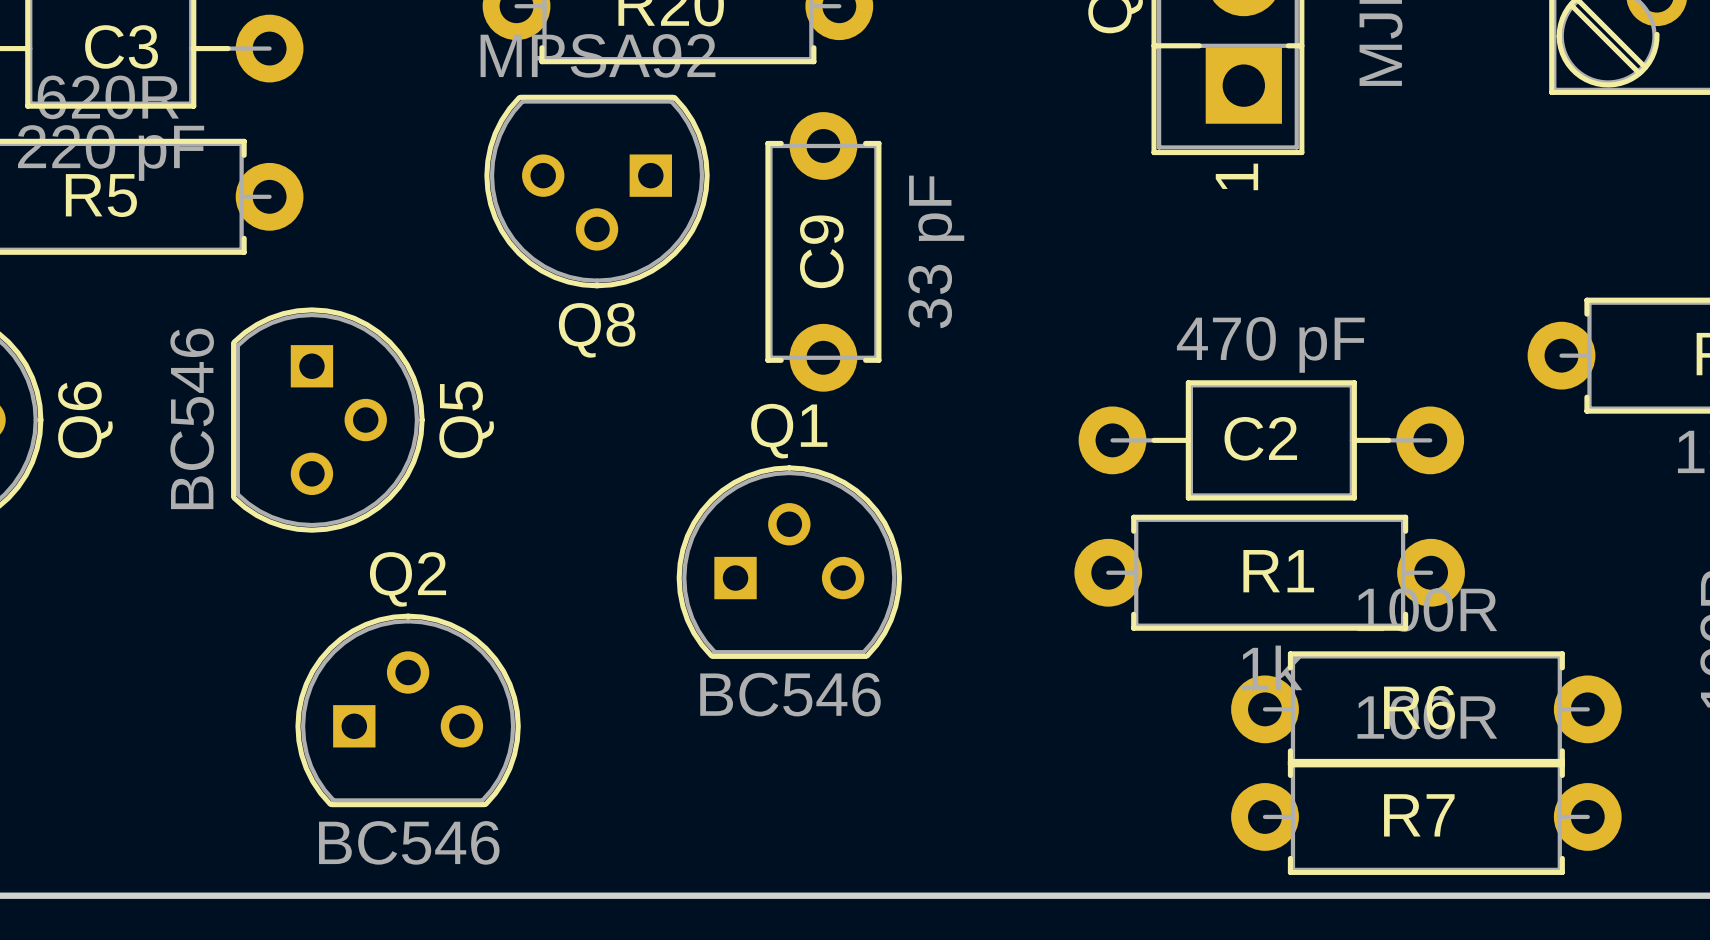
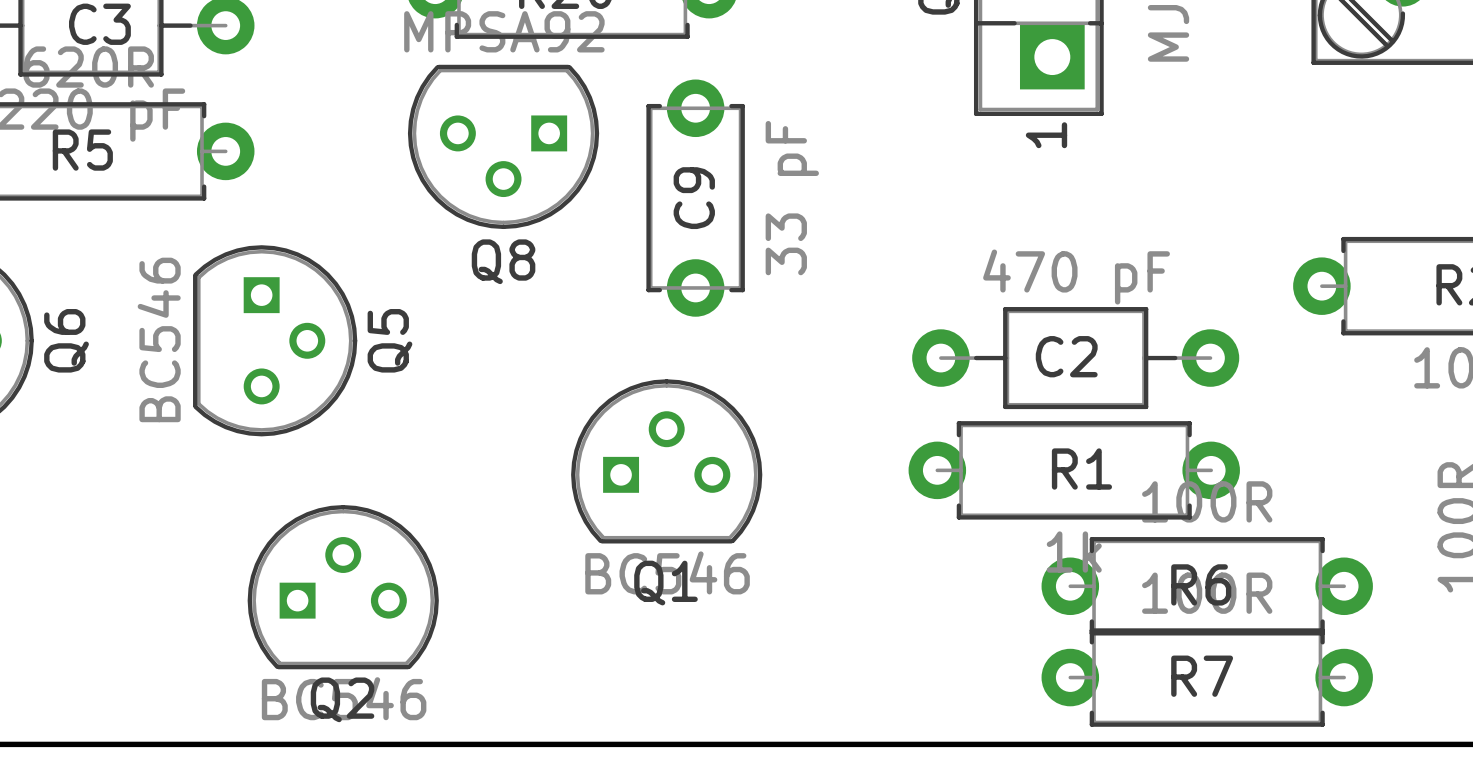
Q1 name position: Q1 (789, 431) -> Q1 (665, 583)
Q2 name position: Q2 (408, 579) -> Q2 (342, 699)

